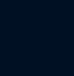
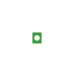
part: none -> (37, 37)

